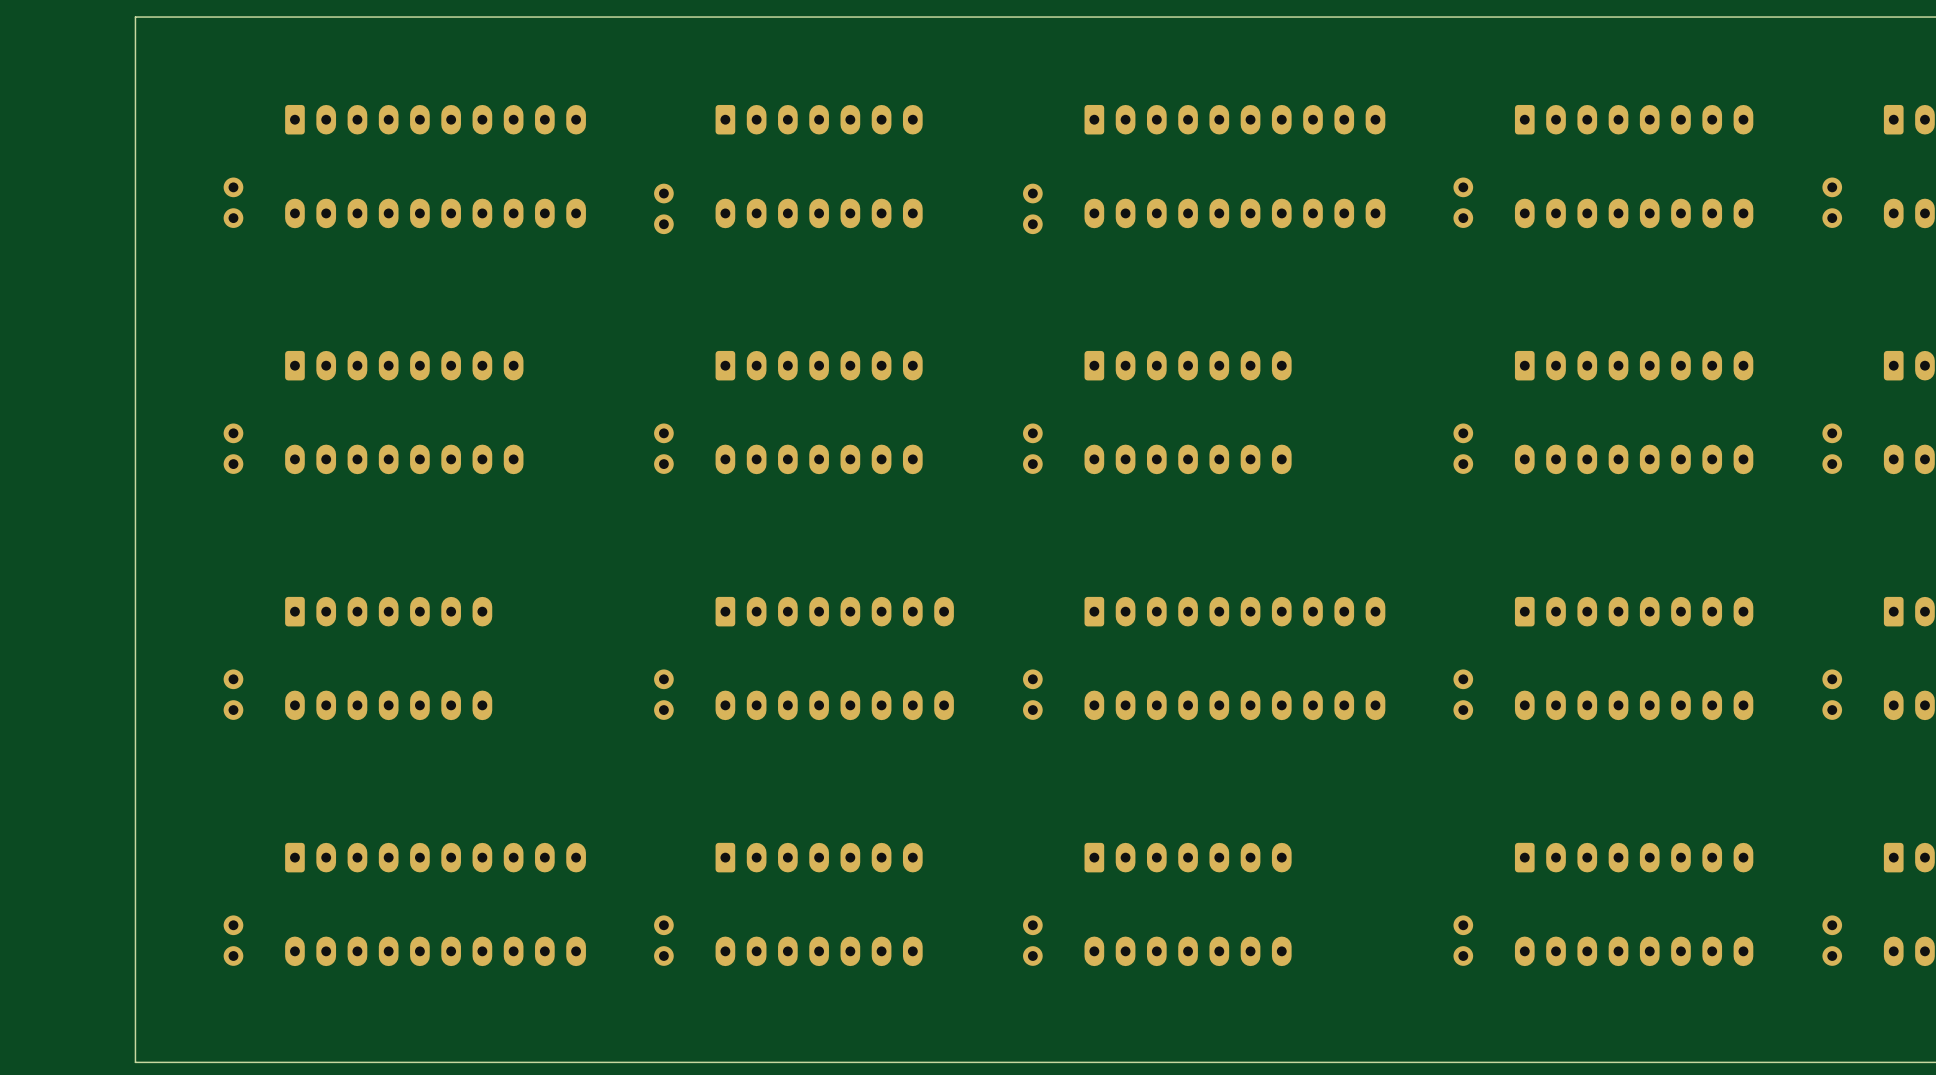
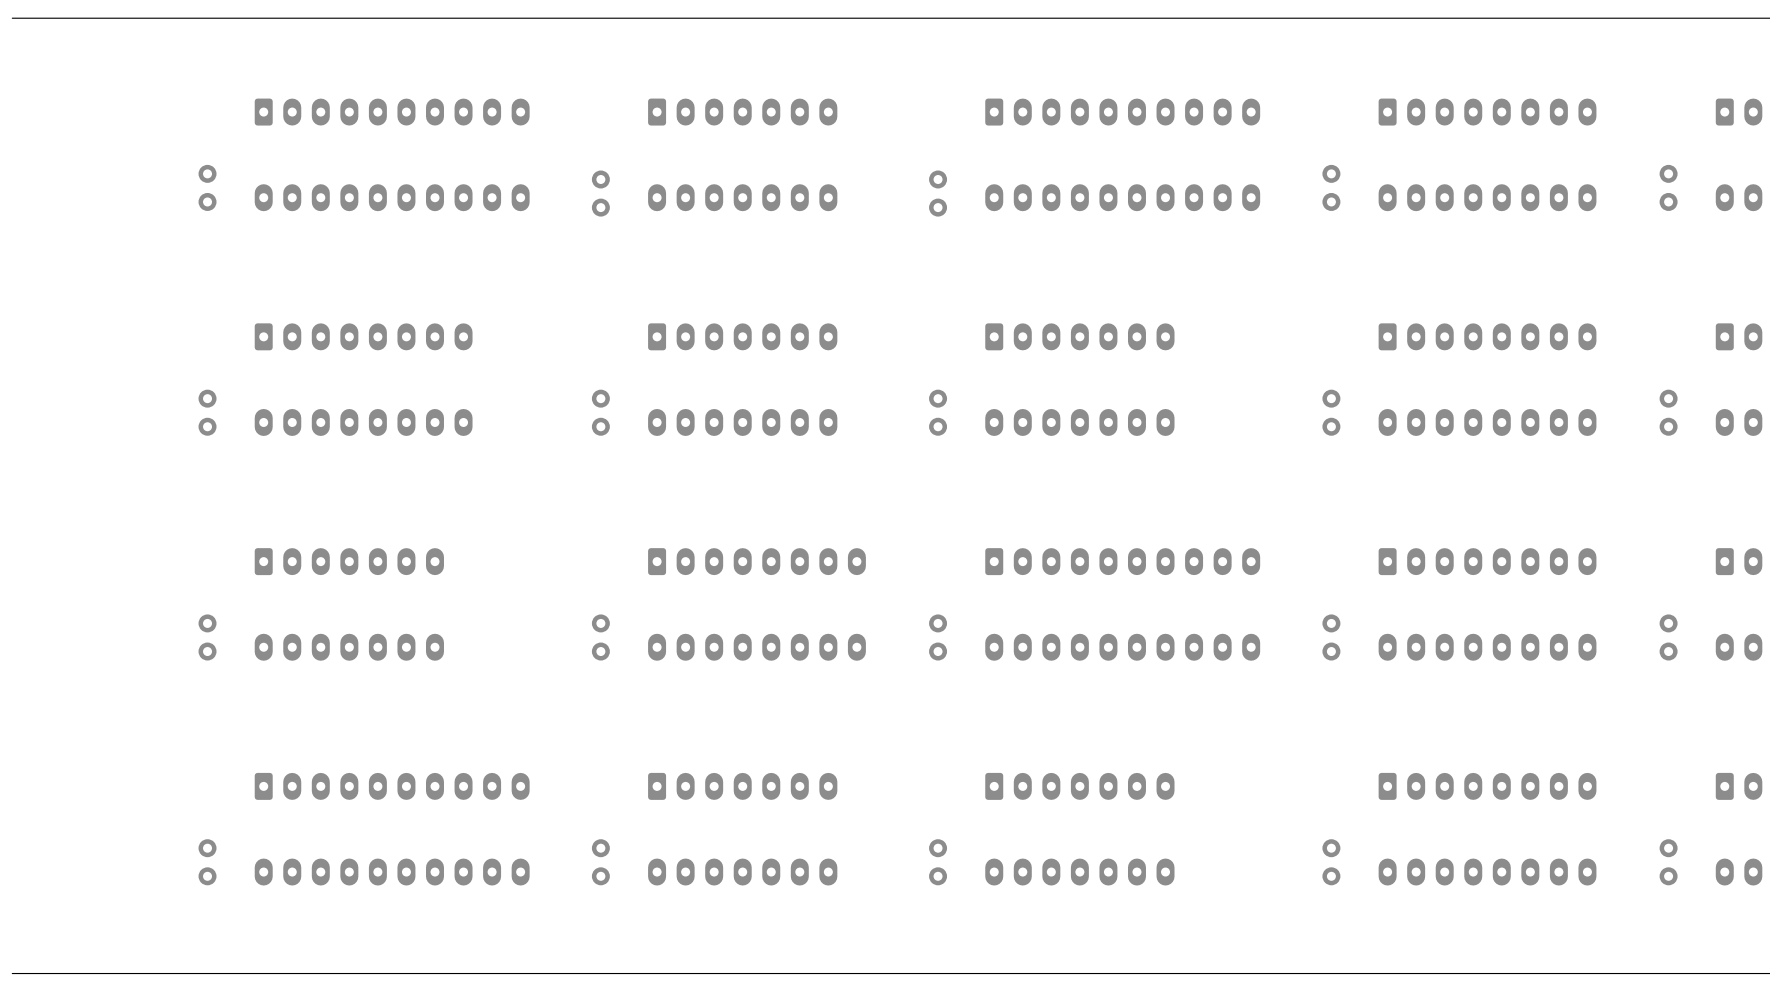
board edge: (135, 17) (135, 1062) -> (117, 18) (12, 18)
board edge: none -> (117, 973) (12, 973)

